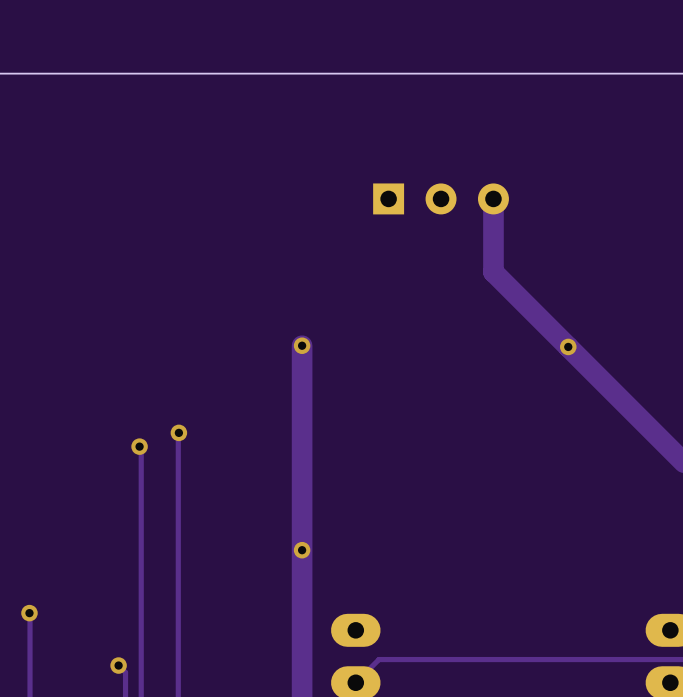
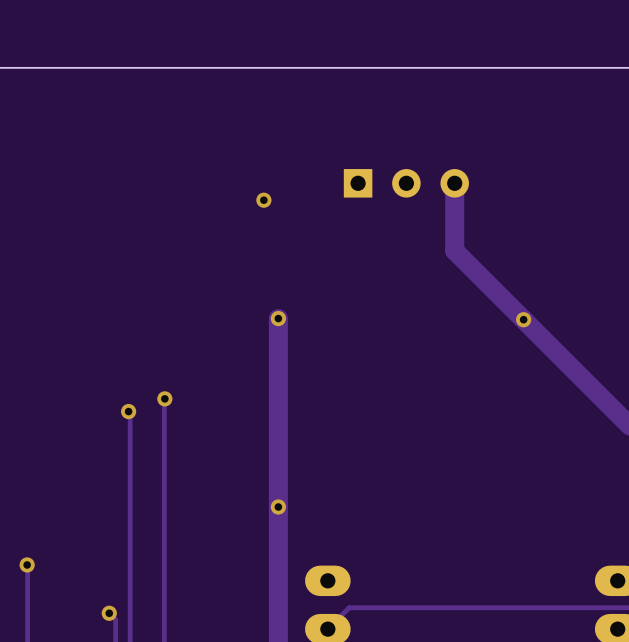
via: none -> (263, 200)

